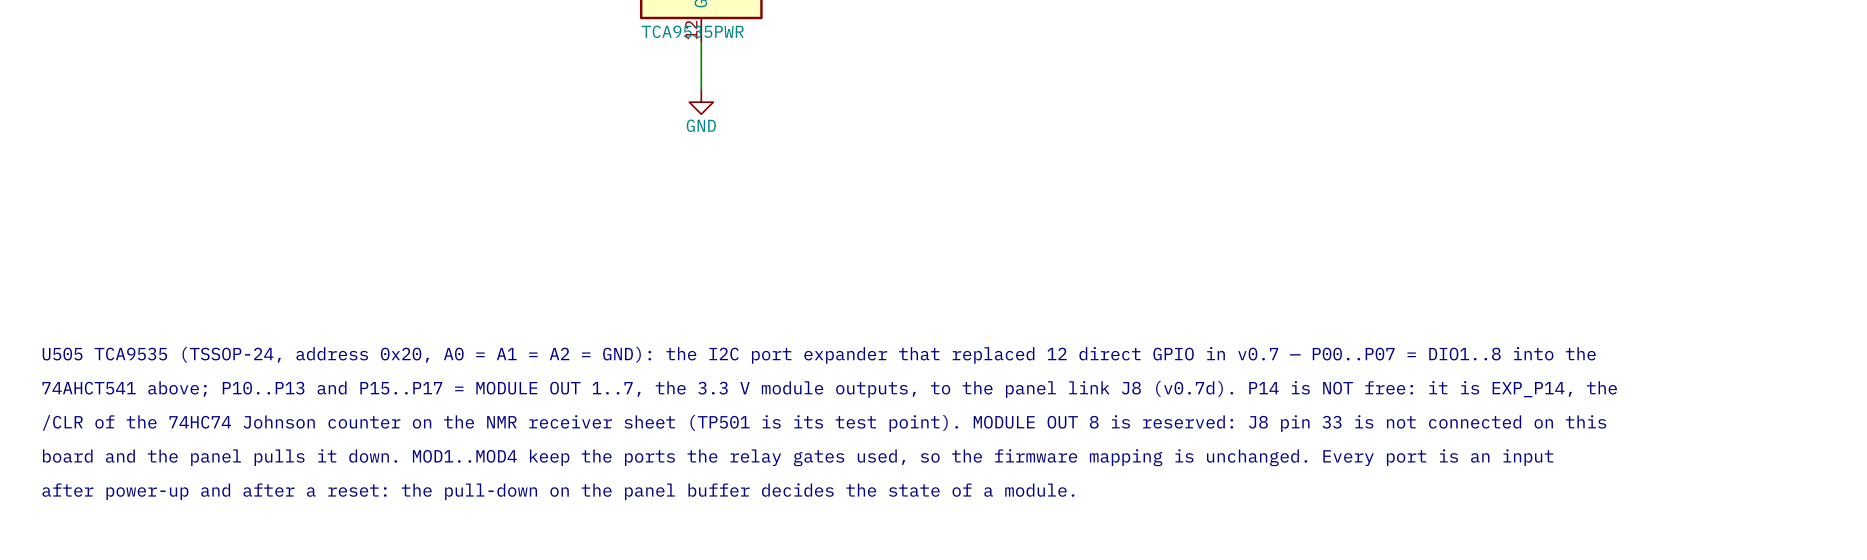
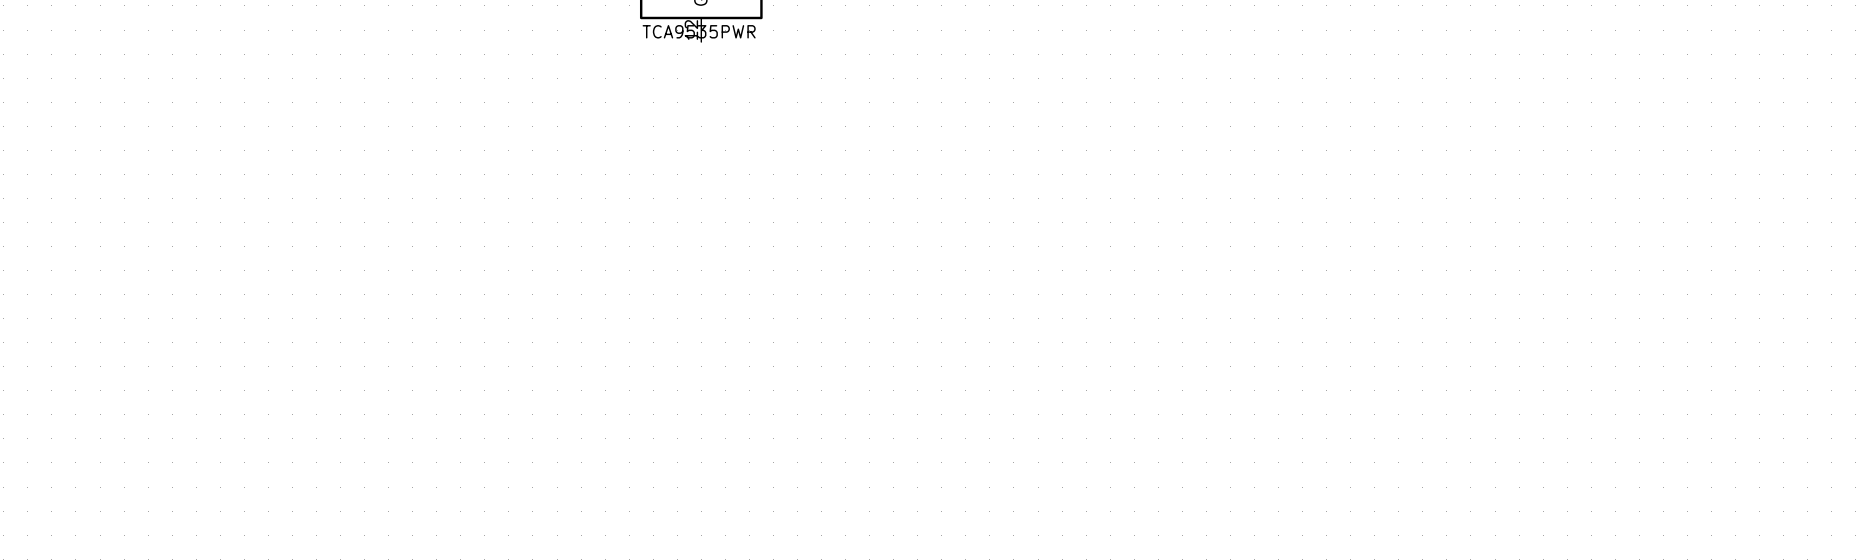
wire: (701, 42) (701, 90) -> none
power symbol: GND (701, 102) -> none
text: U505 TCA9535 (TSSOP-24, address 0x20, A0 = A1 = A2 = GND): the I2C port expander that replaced 12 direct GPIO in v0.7 — P00..P07 = DIO1..8 into the (819, 355) -> none
text: 74AHCT541 above; P10..P13 and P15..P17 = MODULE OUT 1..7, the 3.3 V module outputs, to the panel link J8 (v0.7d). P14 is NOT free: it is EXP_P14, the (829, 389) -> none
text: /CLR of the 74HC74 Johnson counter on the NMR receiver sheet (TP501 is its test point). MODULE OUT 8 is reserved: J8 pin 33 is not connected on this (824, 423) -> none
text: board and the panel pulls it down. MOD1..MOD4 keep the ports the relay gates used, so the firmware mapping is unchanged. Every port is an input (798, 457) -> none
text: after power-up and after a reset: the pull-down on the panel buffer decides the state of a module. (558, 491) -> none

